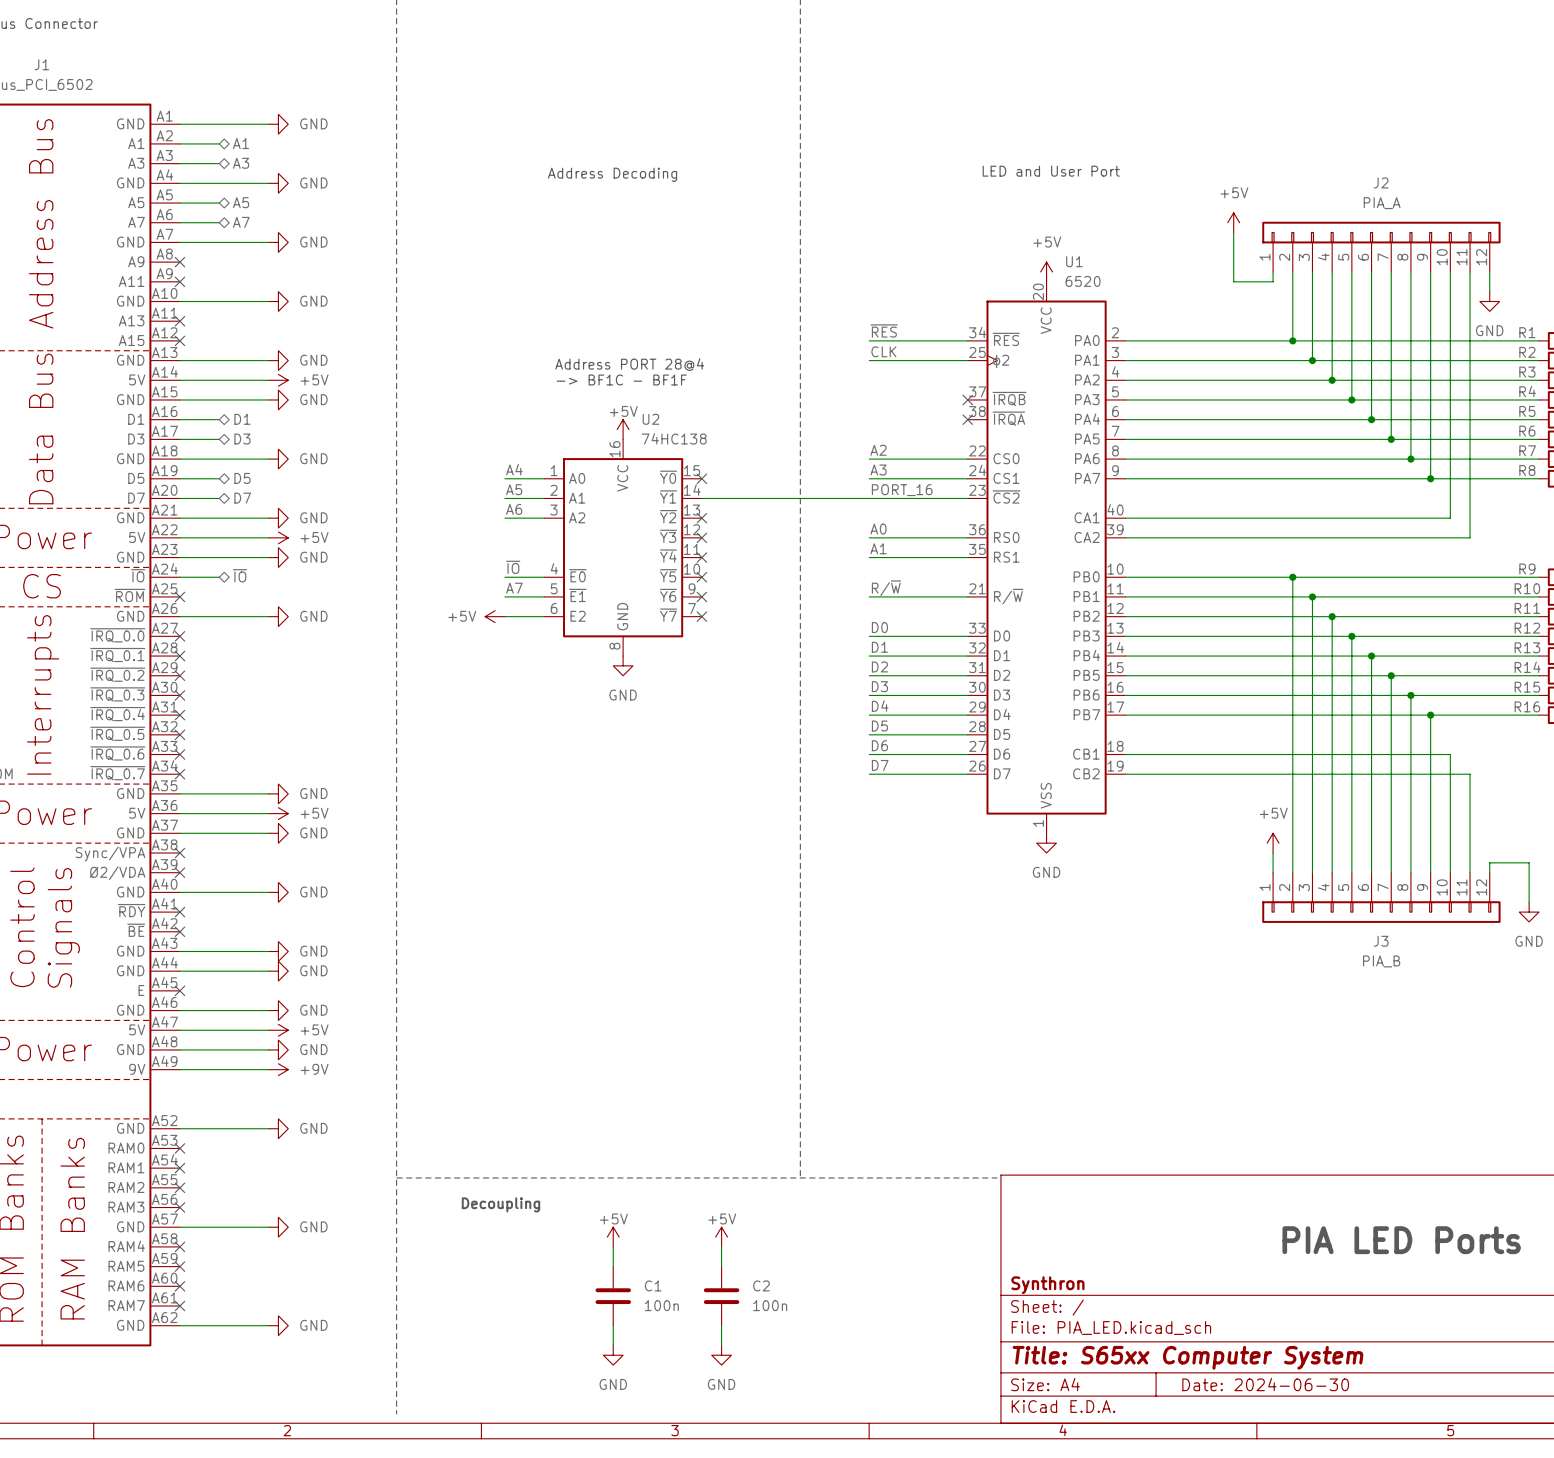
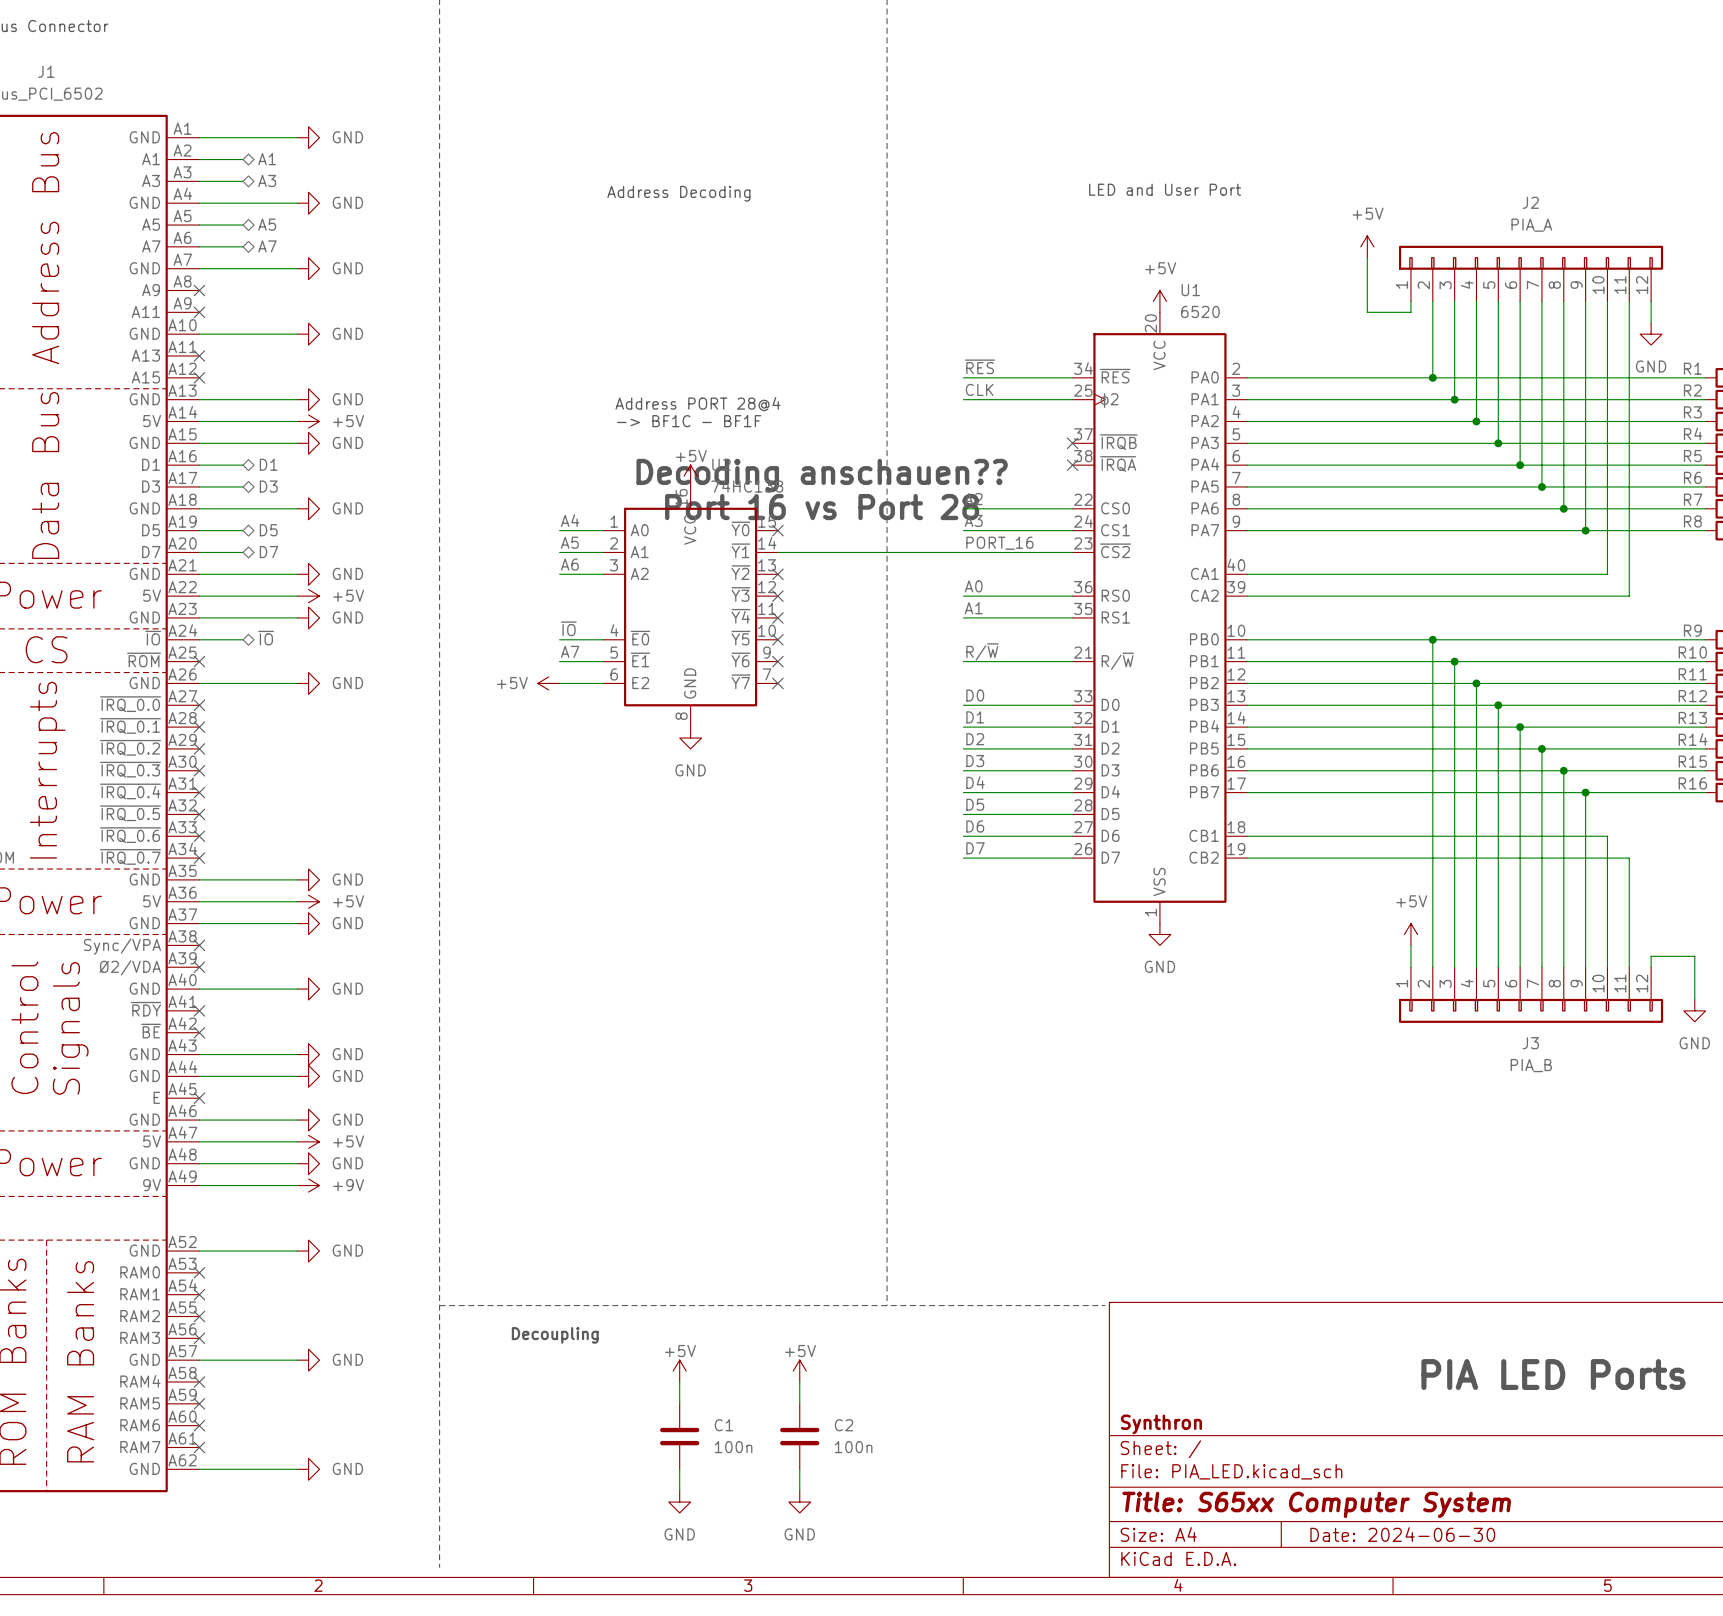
text: none -> Decoding anschauen?? (822, 475)
text: none -> Port 16 vs Port 28 (822, 507)

